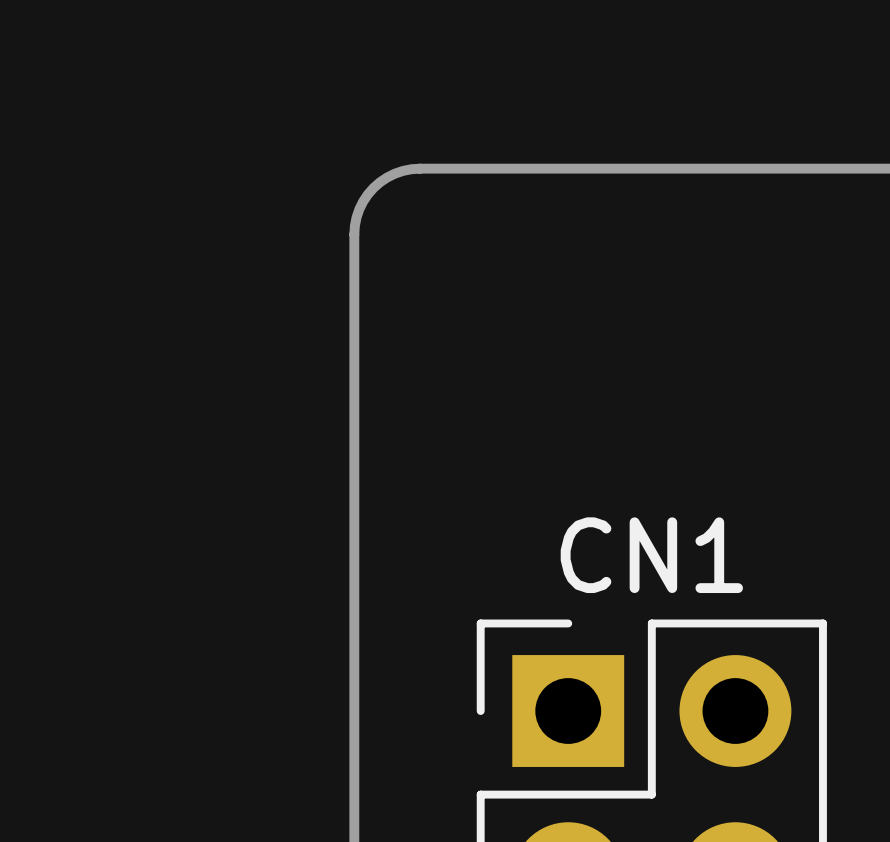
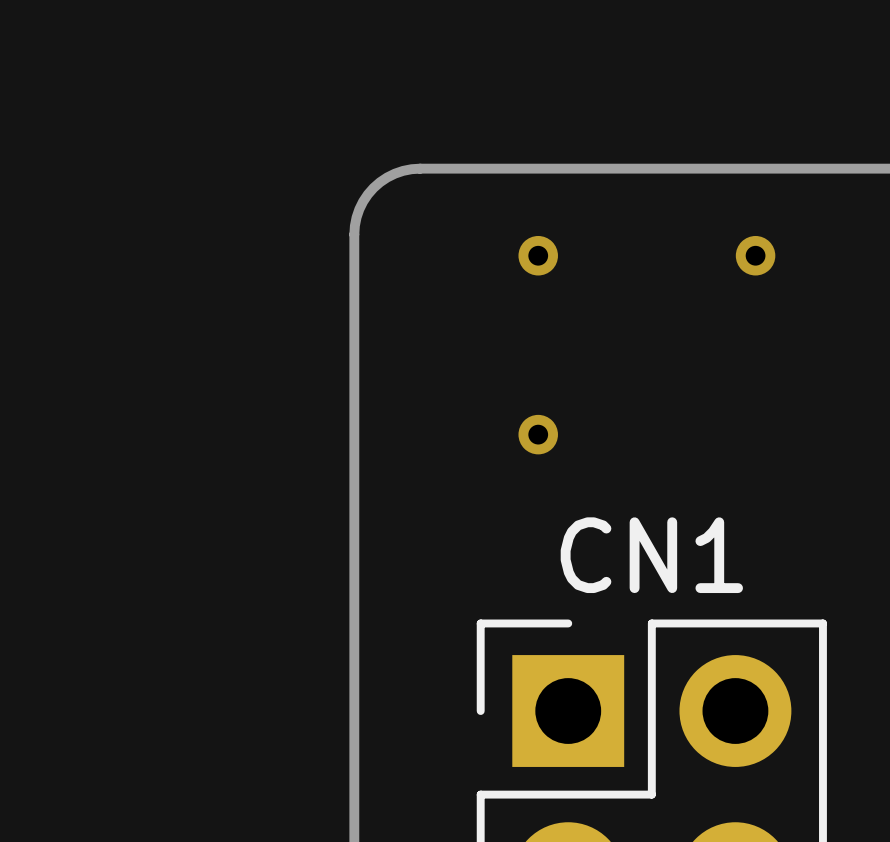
via: none -> (538, 255)
via: none -> (755, 255)
via: none -> (538, 434)

